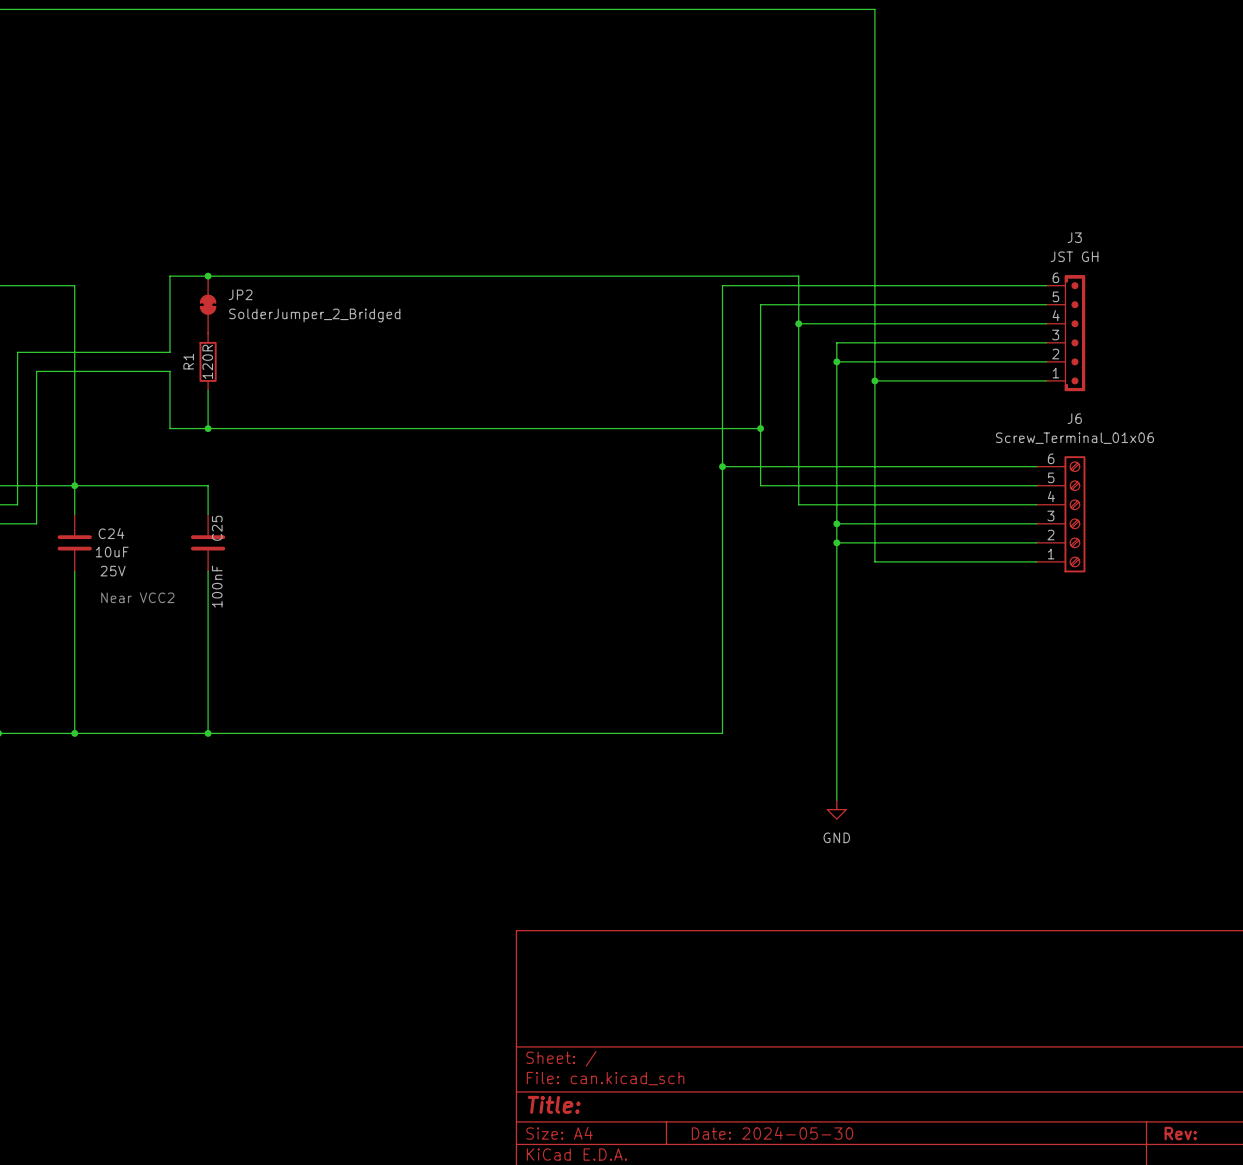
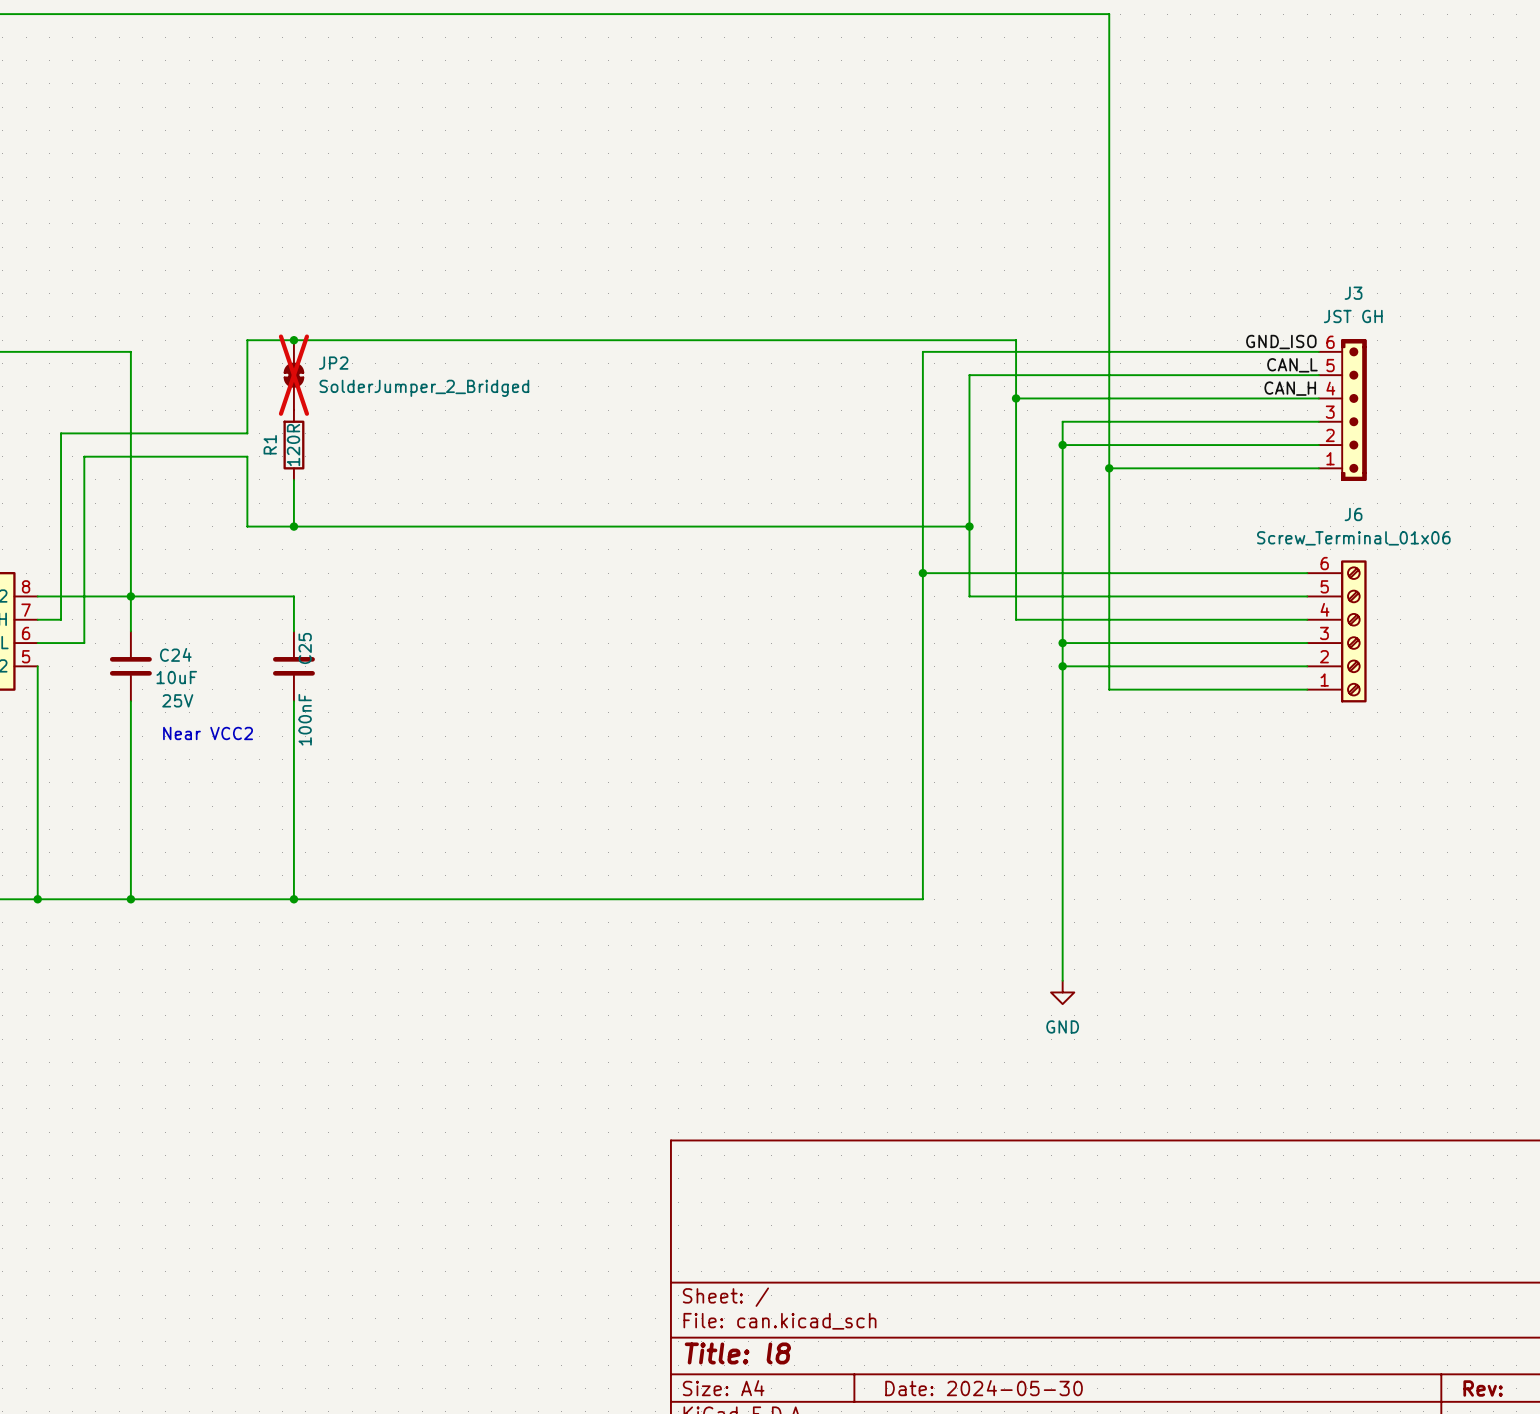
label: none -> GND_ISO (1281, 342)
label: none -> CAN_L (1292, 365)
JP2 do-not-place cross: none -> (293, 375)
label: none -> CAN_H (1290, 388)
title block: Title: (554, 1104) -> Title: l8 (737, 1353)

